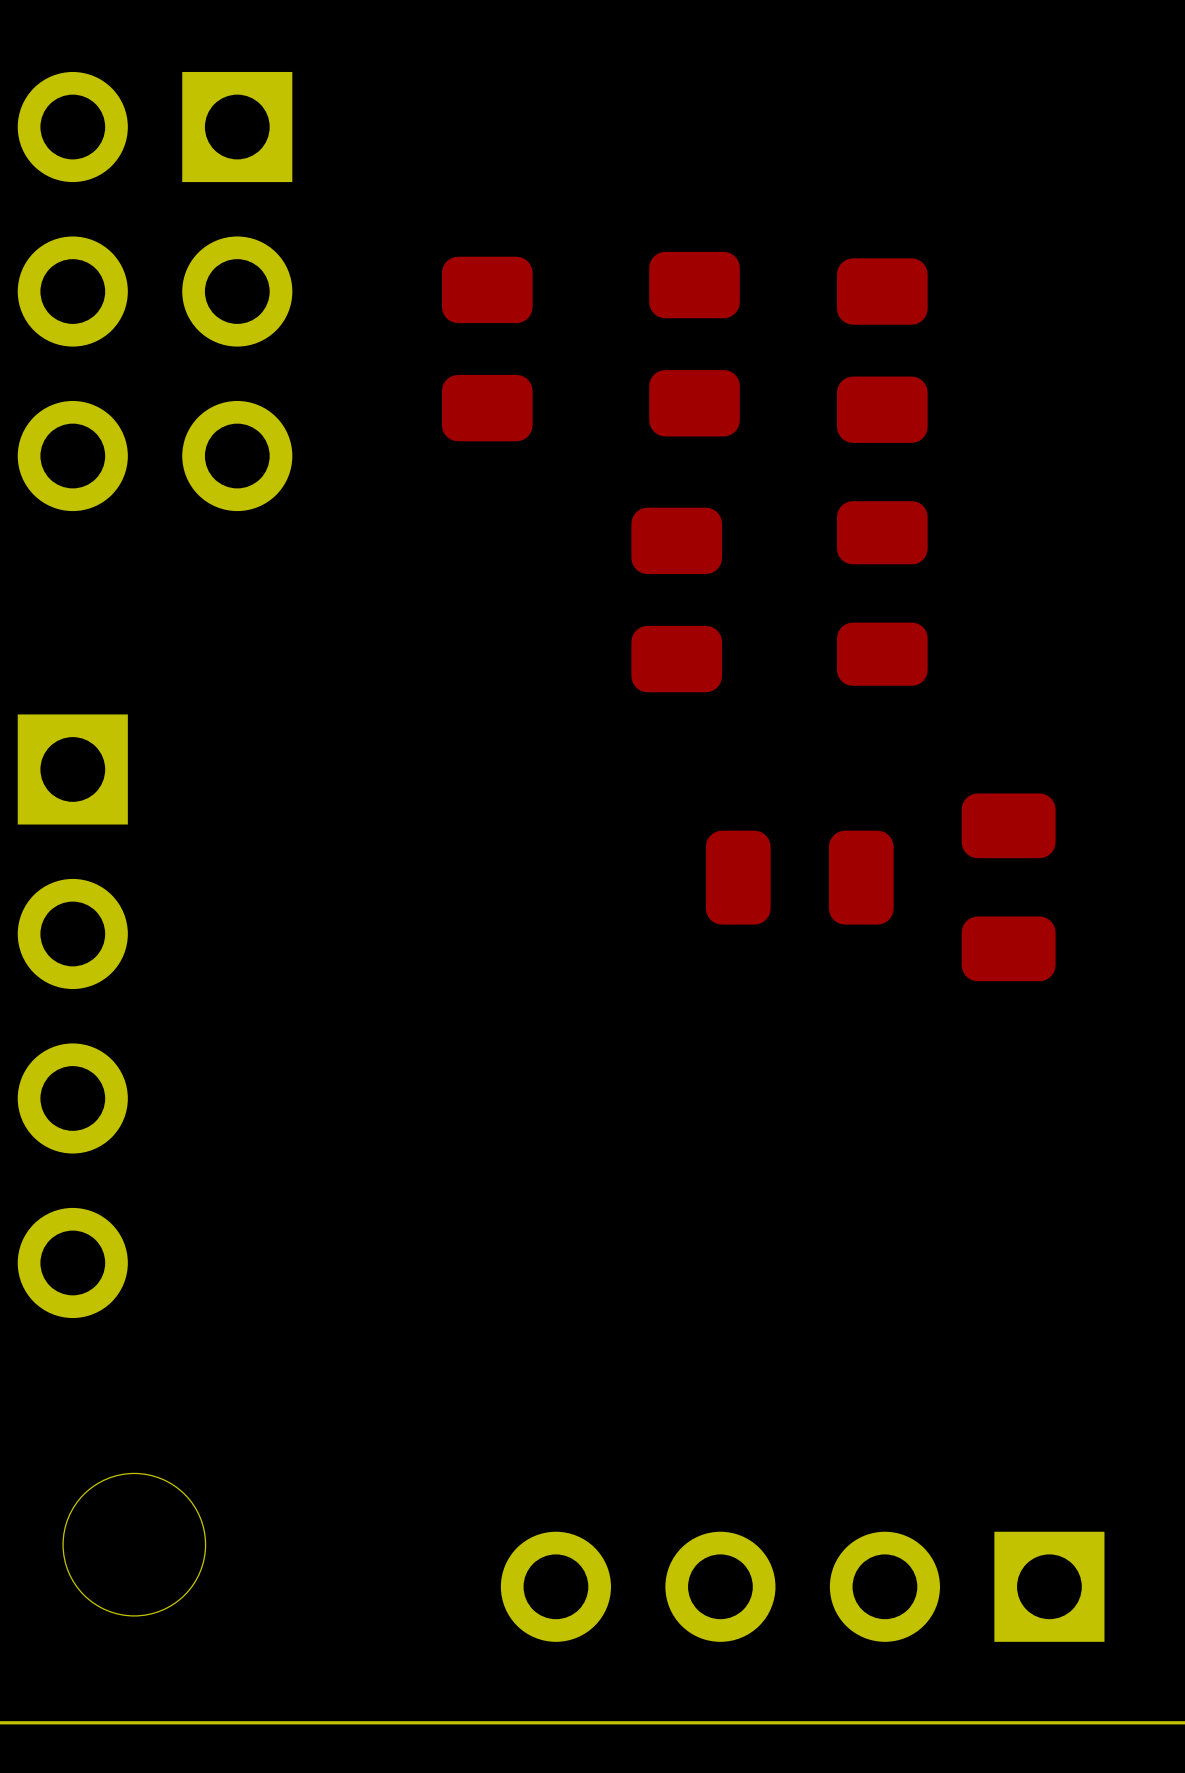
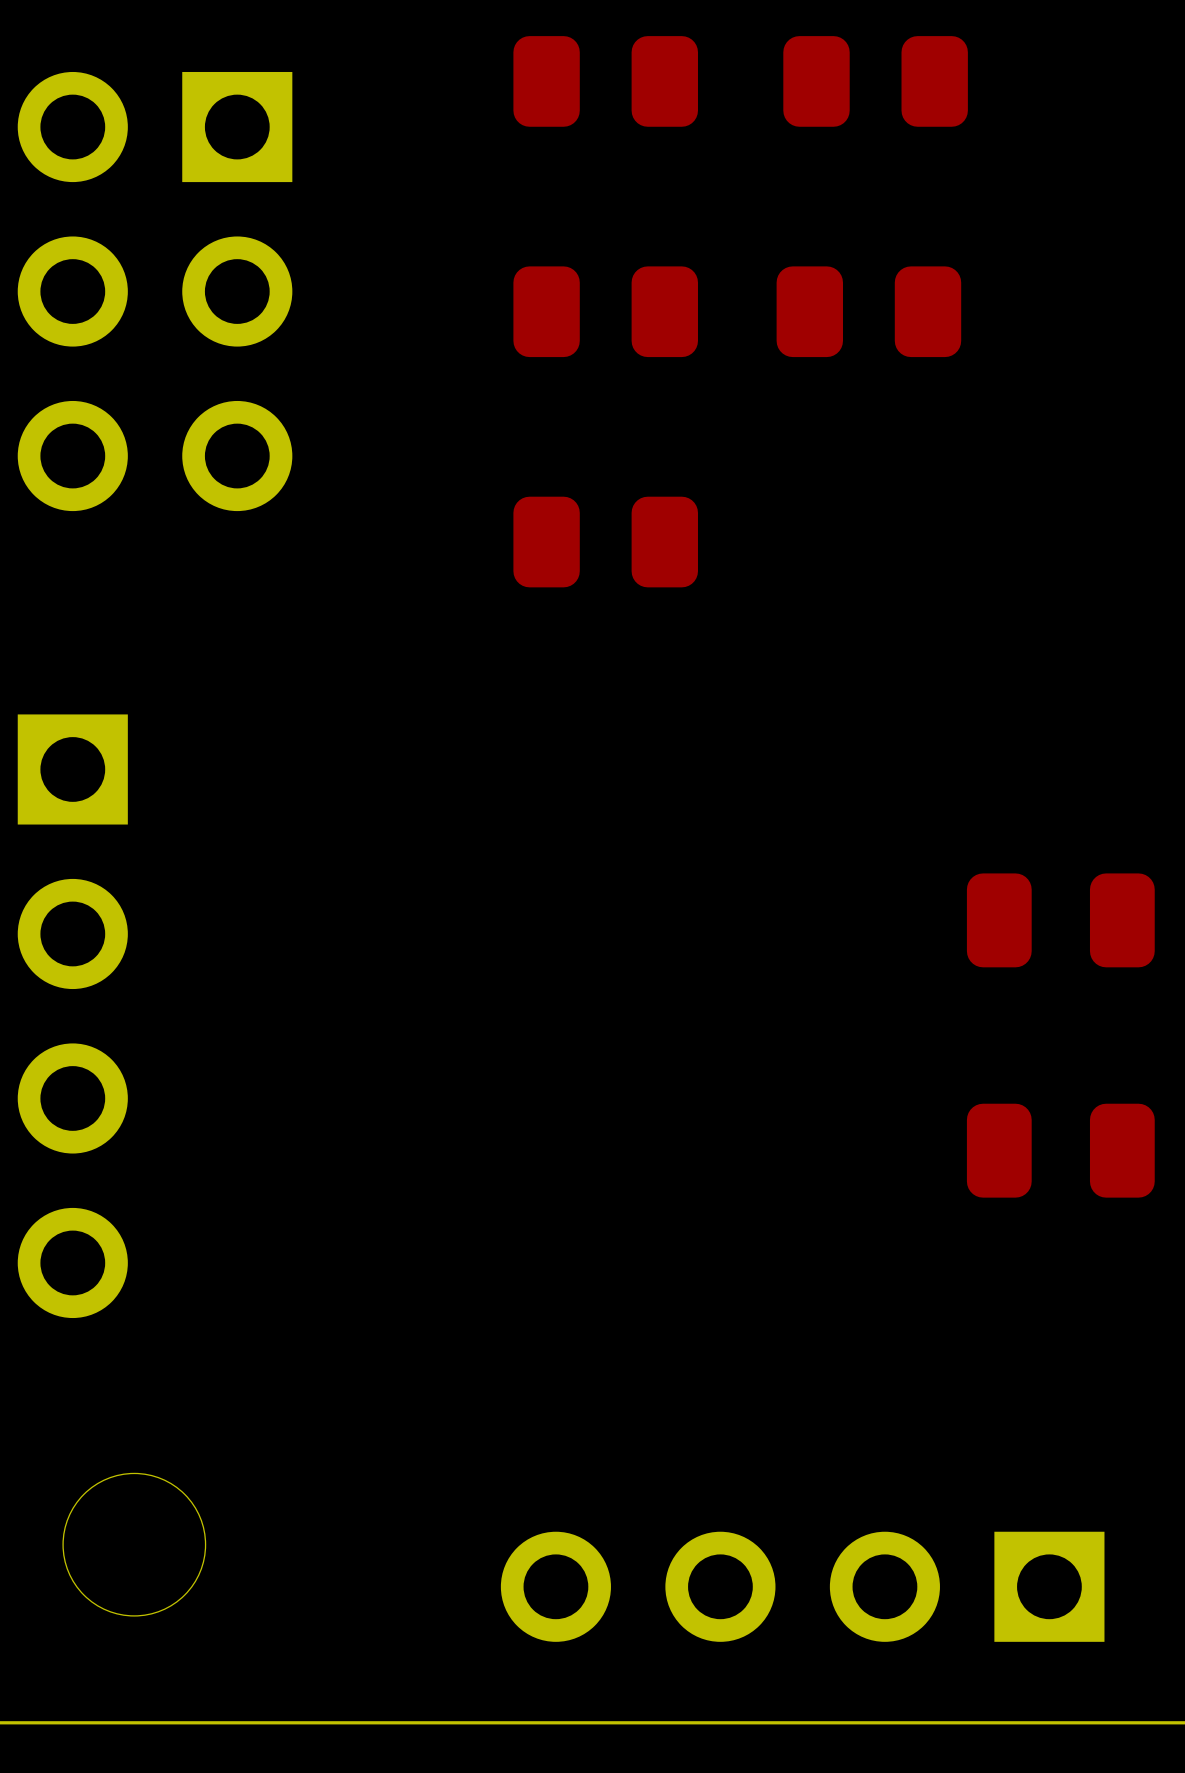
part: none -> (605, 81)
part: none -> (875, 81)
part: none -> (605, 311)
part: (694, 344) -> none
part: (487, 349) -> none
part rotation: 0° (882, 350) -> 90° clockwise (868, 311)
part: (882, 593) -> none
part rotation: 0° (676, 599) -> 90° clockwise (605, 542)
part position: (799, 877) -> (1060, 1150)
part rotation: 0° (1008, 887) -> 90° clockwise (1060, 920)

